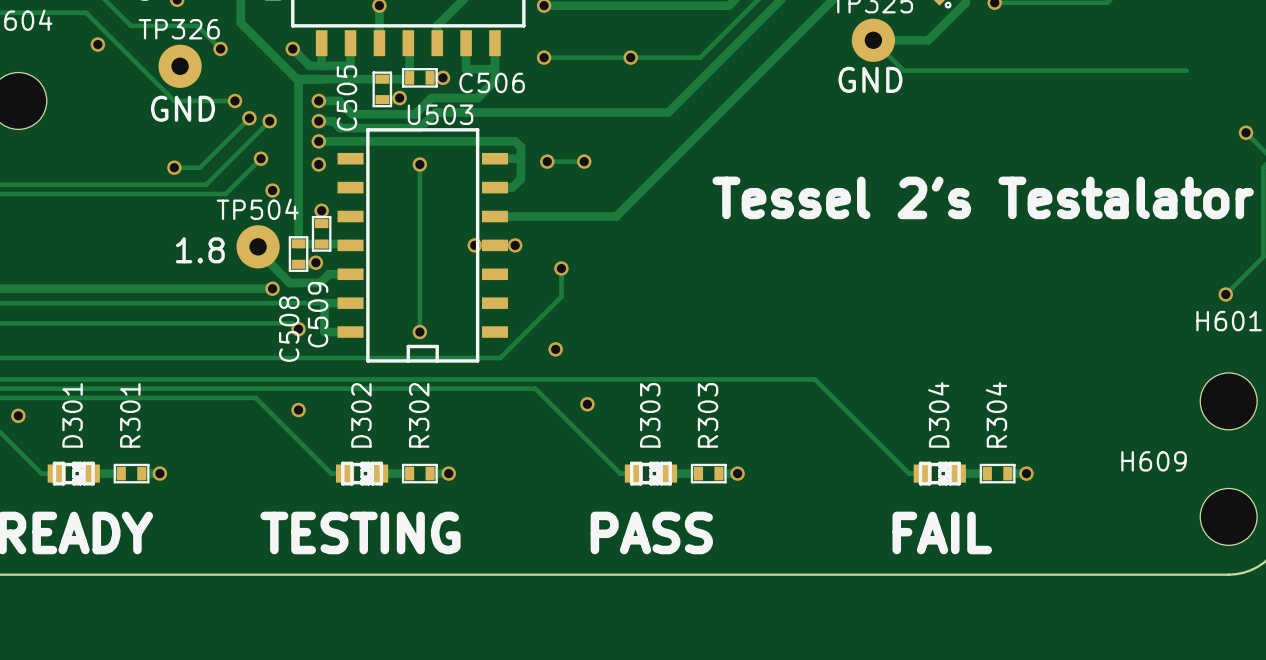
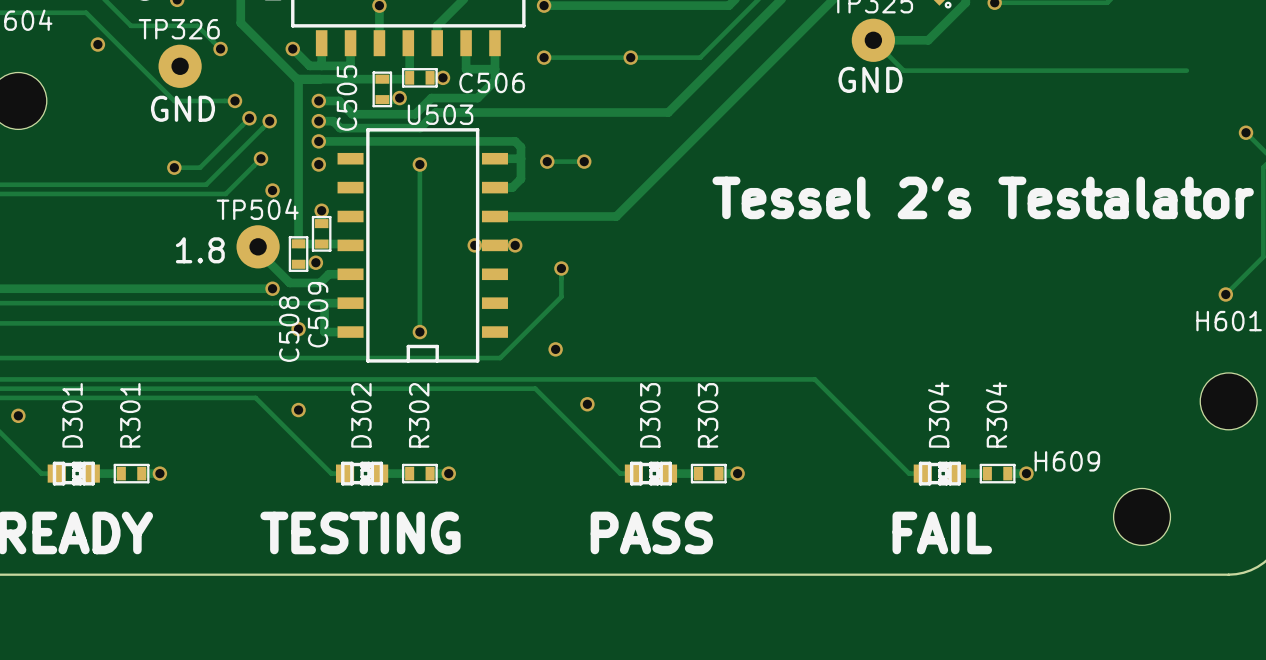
H609 position: (1228, 516) -> (1142, 516)

